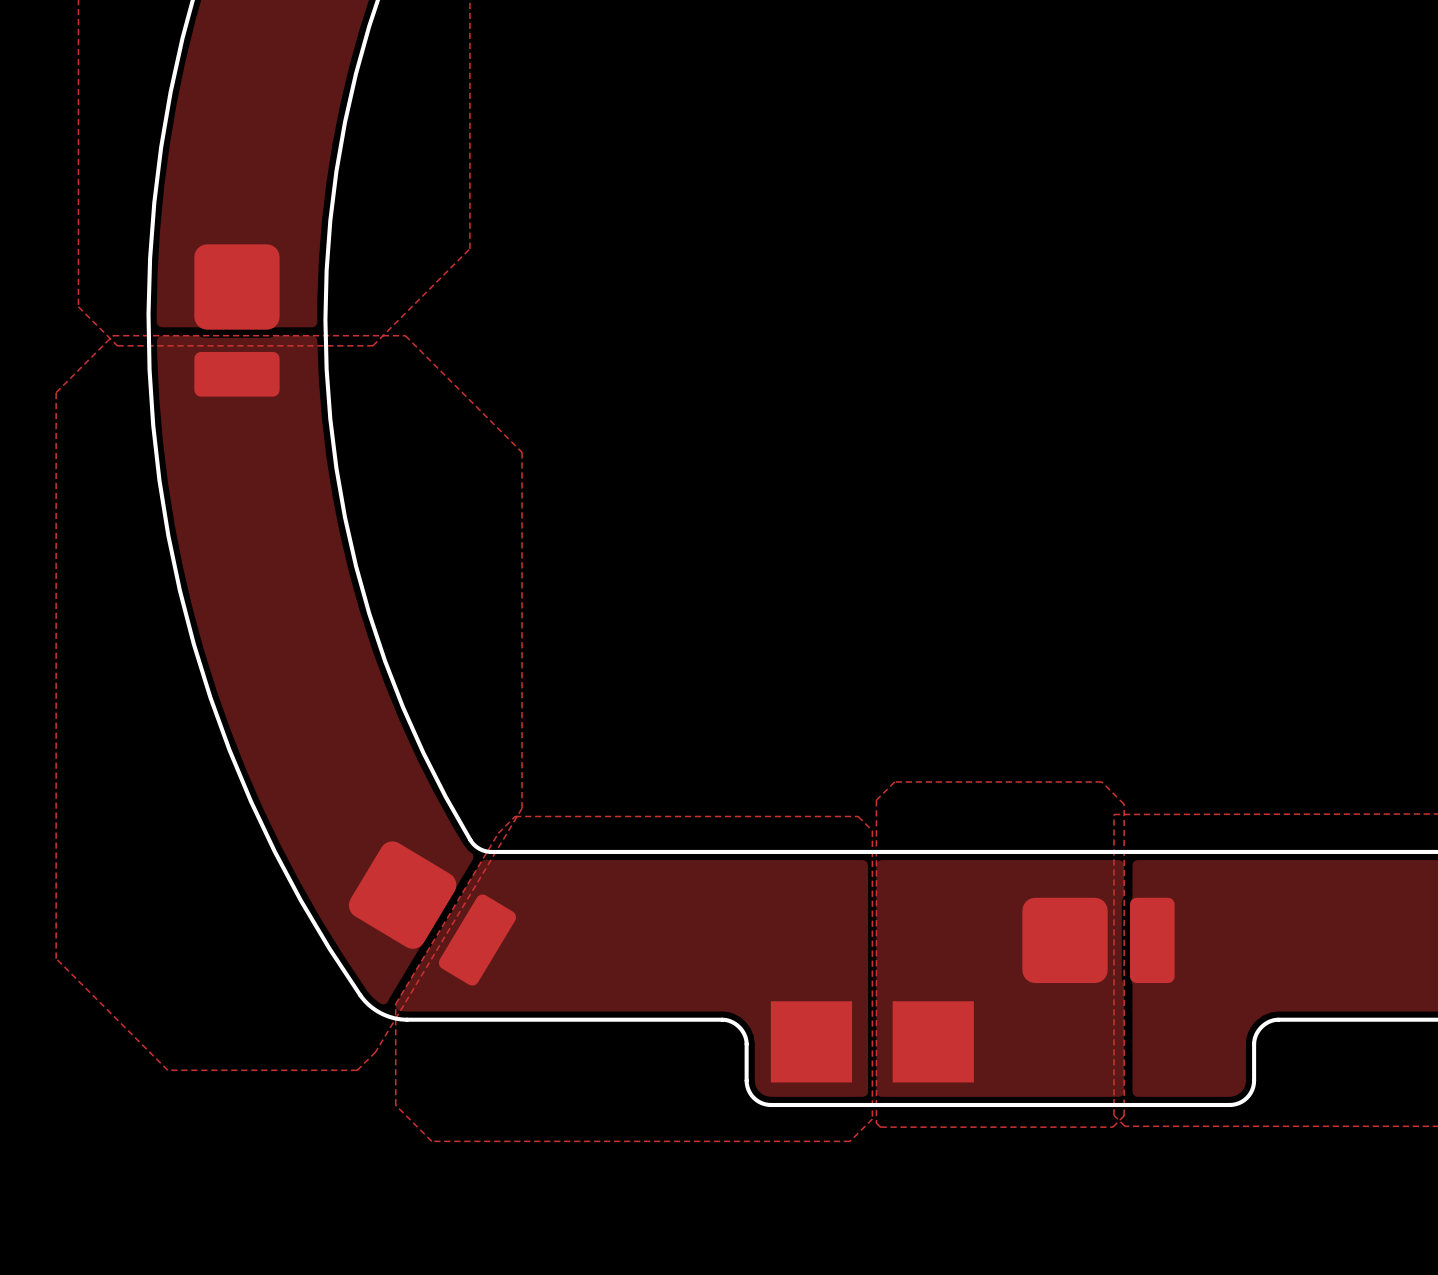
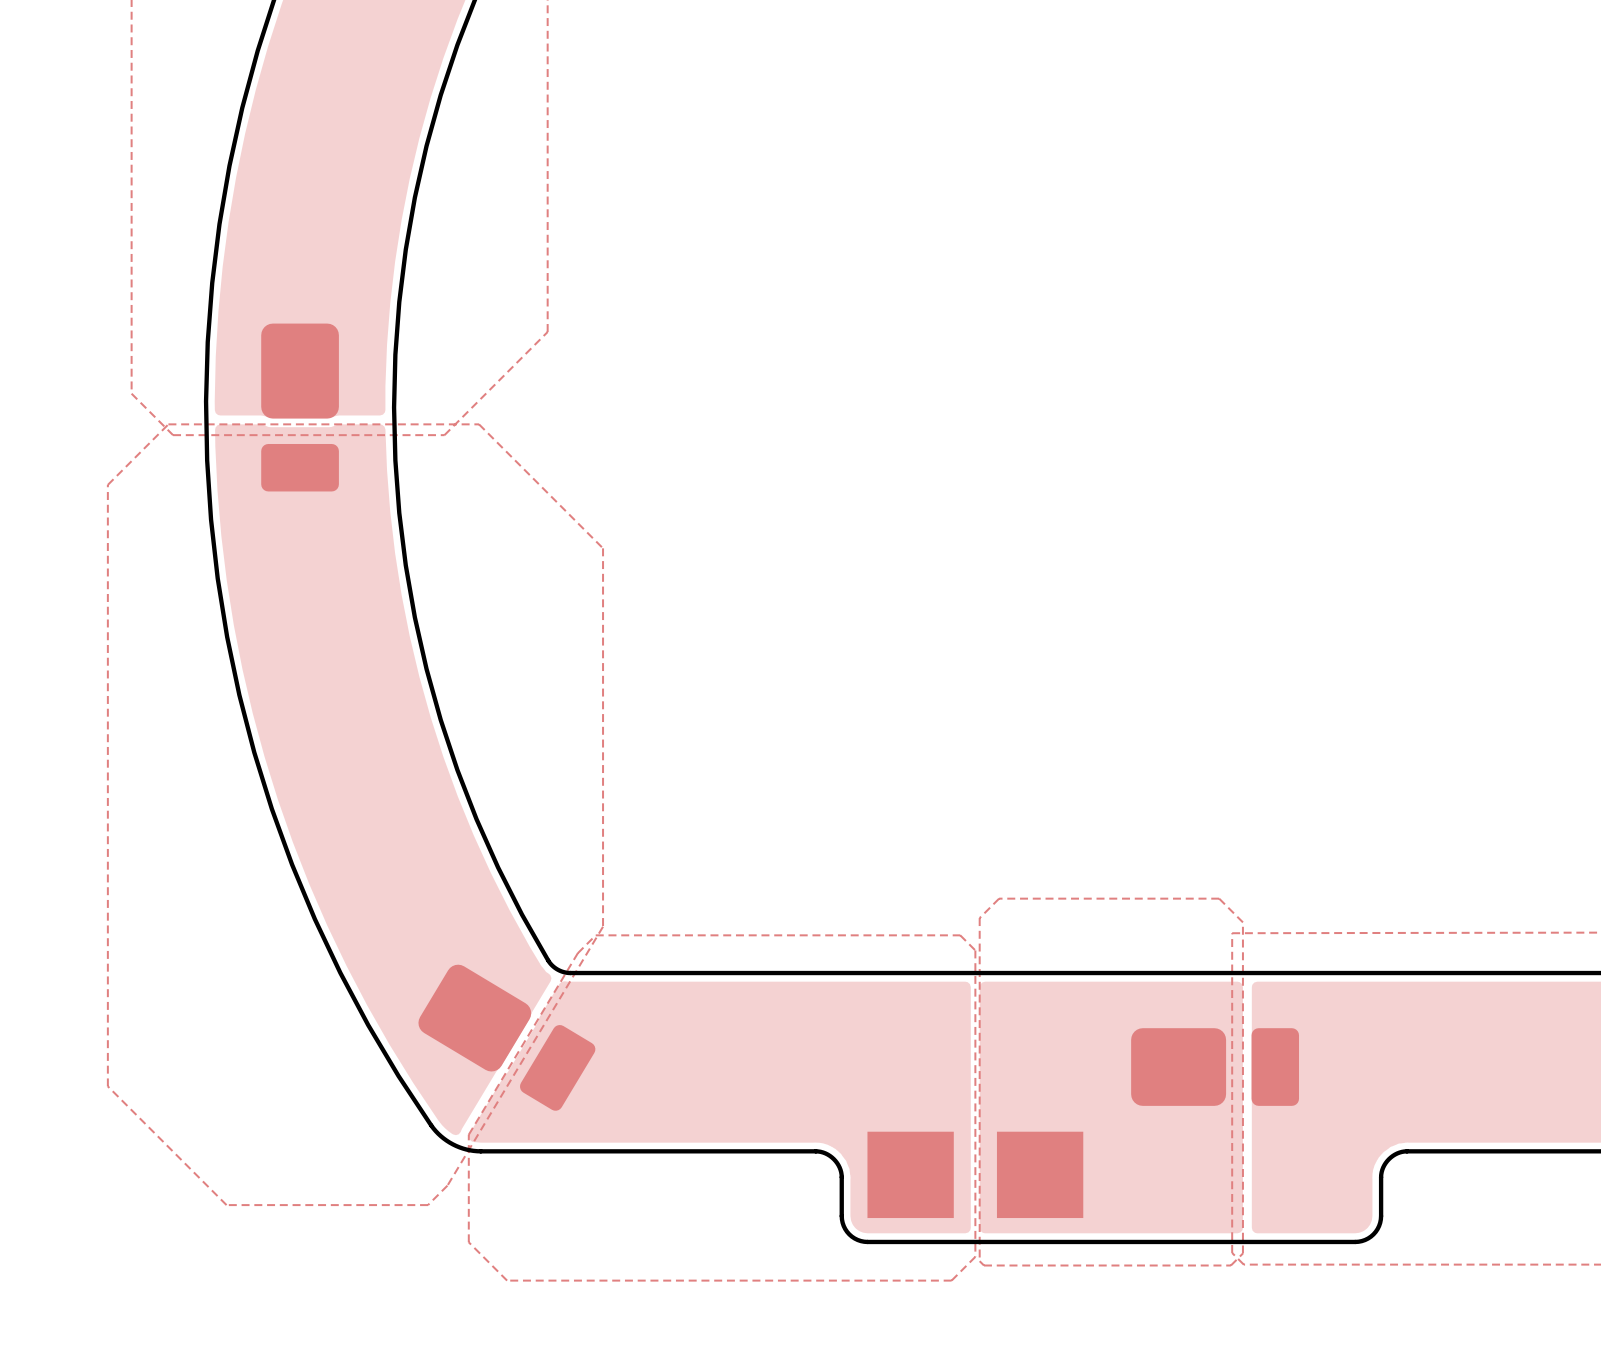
part footprint: [194, 244, 280, 397] -> [261, 323, 339, 492]
part footprint: [348, 841, 517, 986] -> [418, 964, 596, 1111]
part footprint: [1022, 897, 1175, 984] -> [1131, 1028, 1300, 1106]

